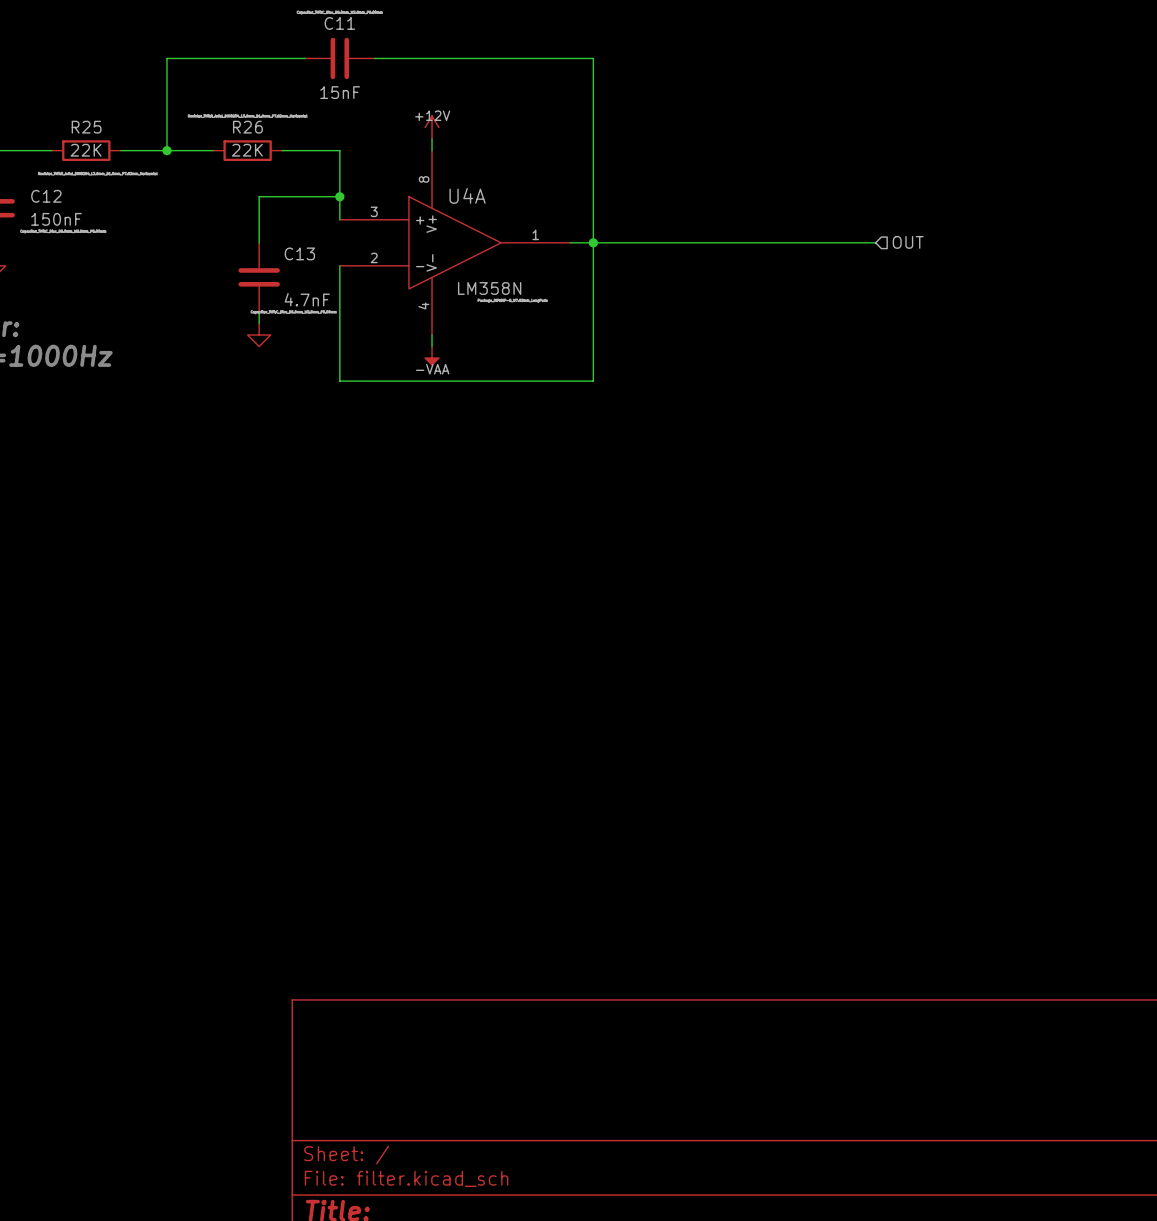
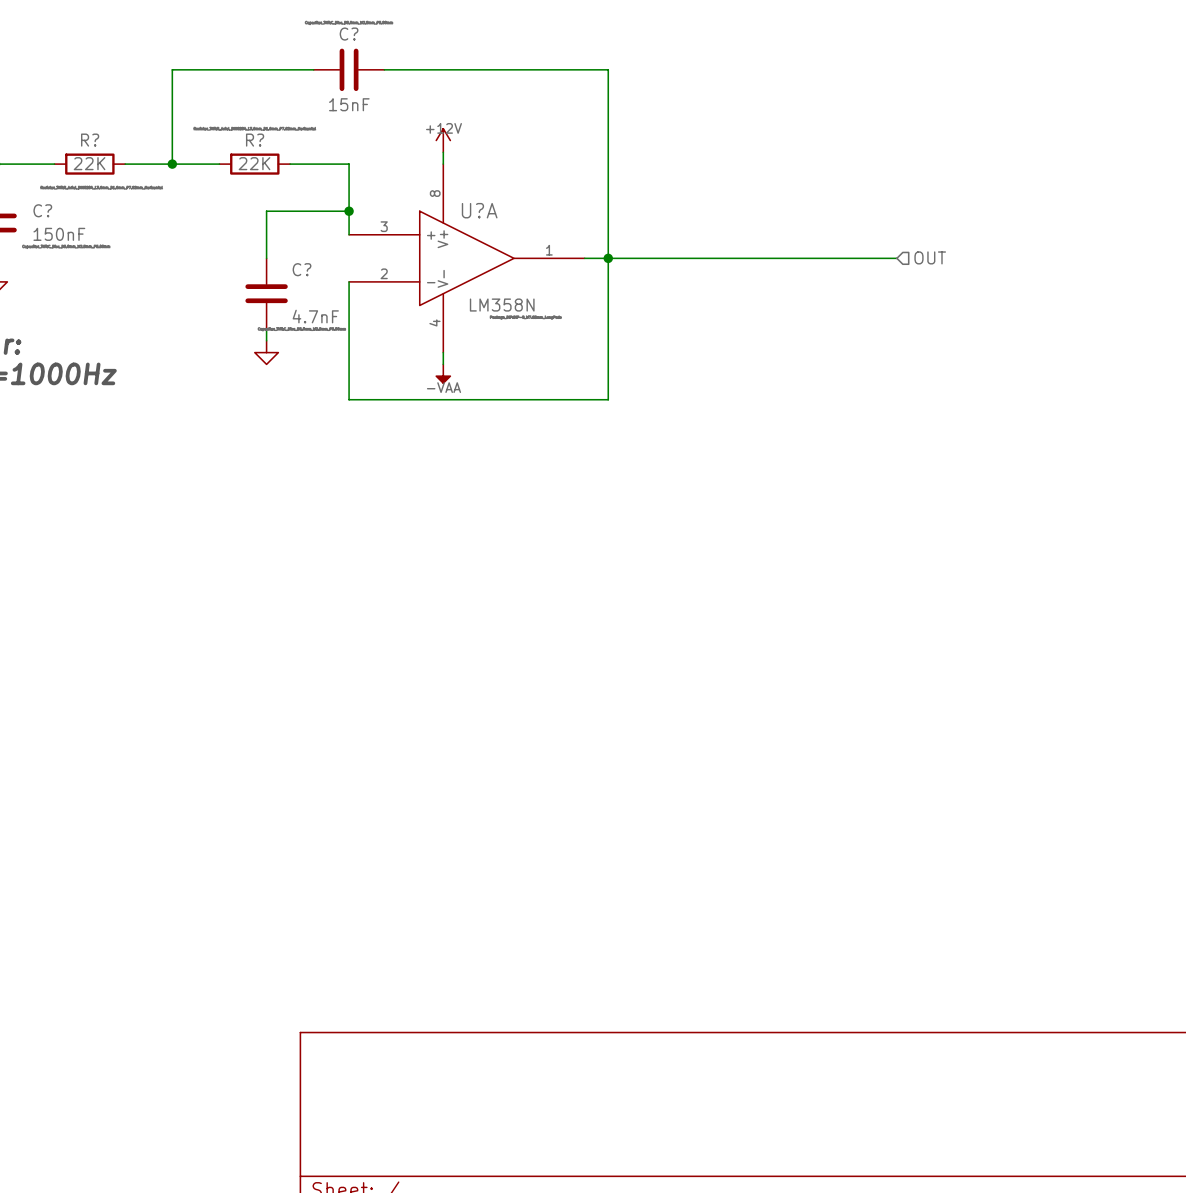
C11 name: C11 (339, 23) -> C? (349, 34)
R25 name: R25 (86, 127) -> R? (90, 140)
R26 name: R26 (247, 127) -> R? (255, 140)
U4A name: U4A (467, 195) -> U?A (479, 210)
C12 name: C12 (46, 196) -> C? (42, 210)
C13 name: C13 (299, 253) -> C? (302, 269)

